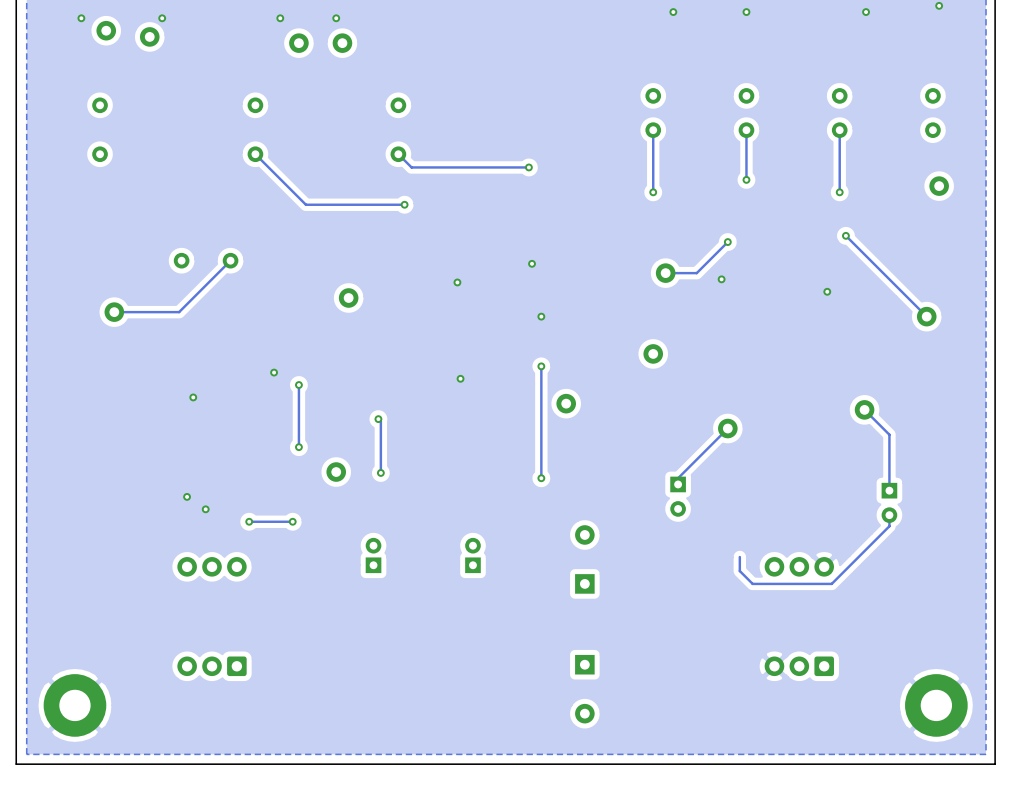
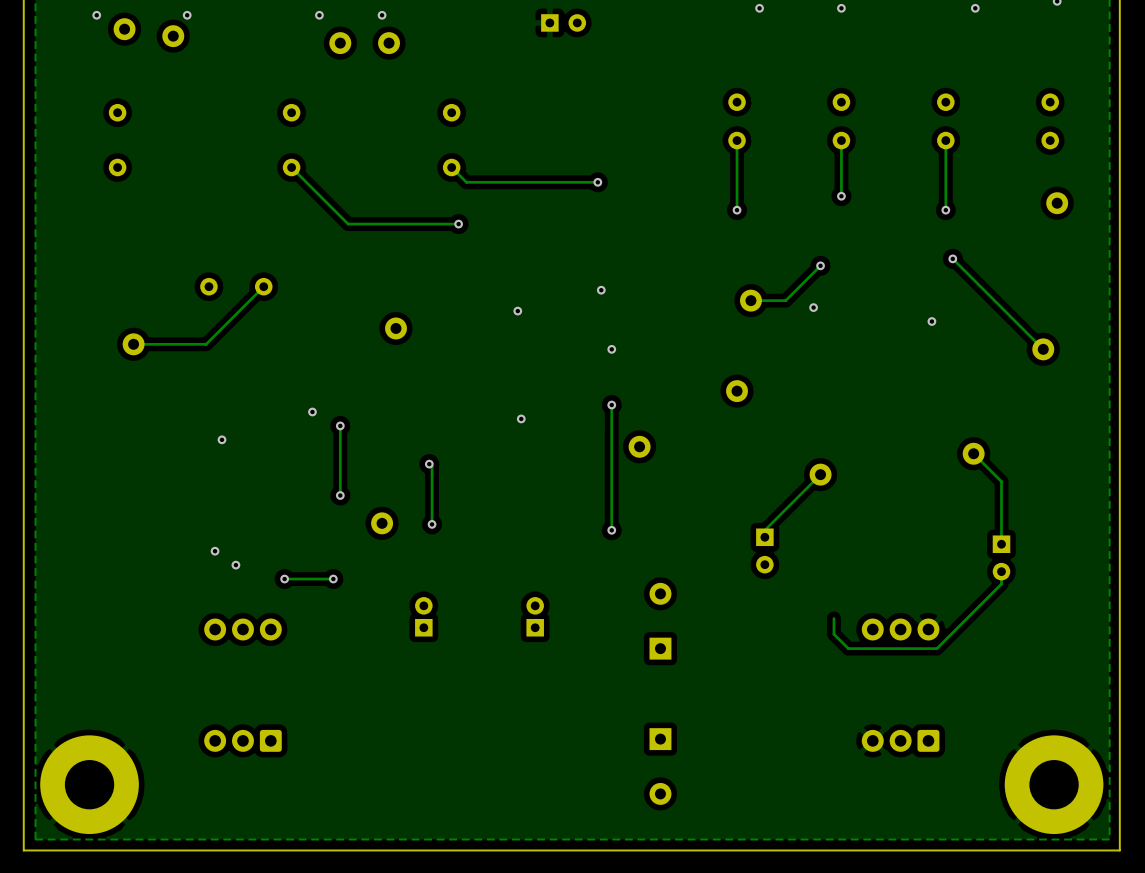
part: none -> (563, 22)
part footprint: [43, 674, 107, 737] -> [40, 735, 139, 835]
part footprint: [905, 674, 968, 737] -> [1004, 735, 1104, 835]

